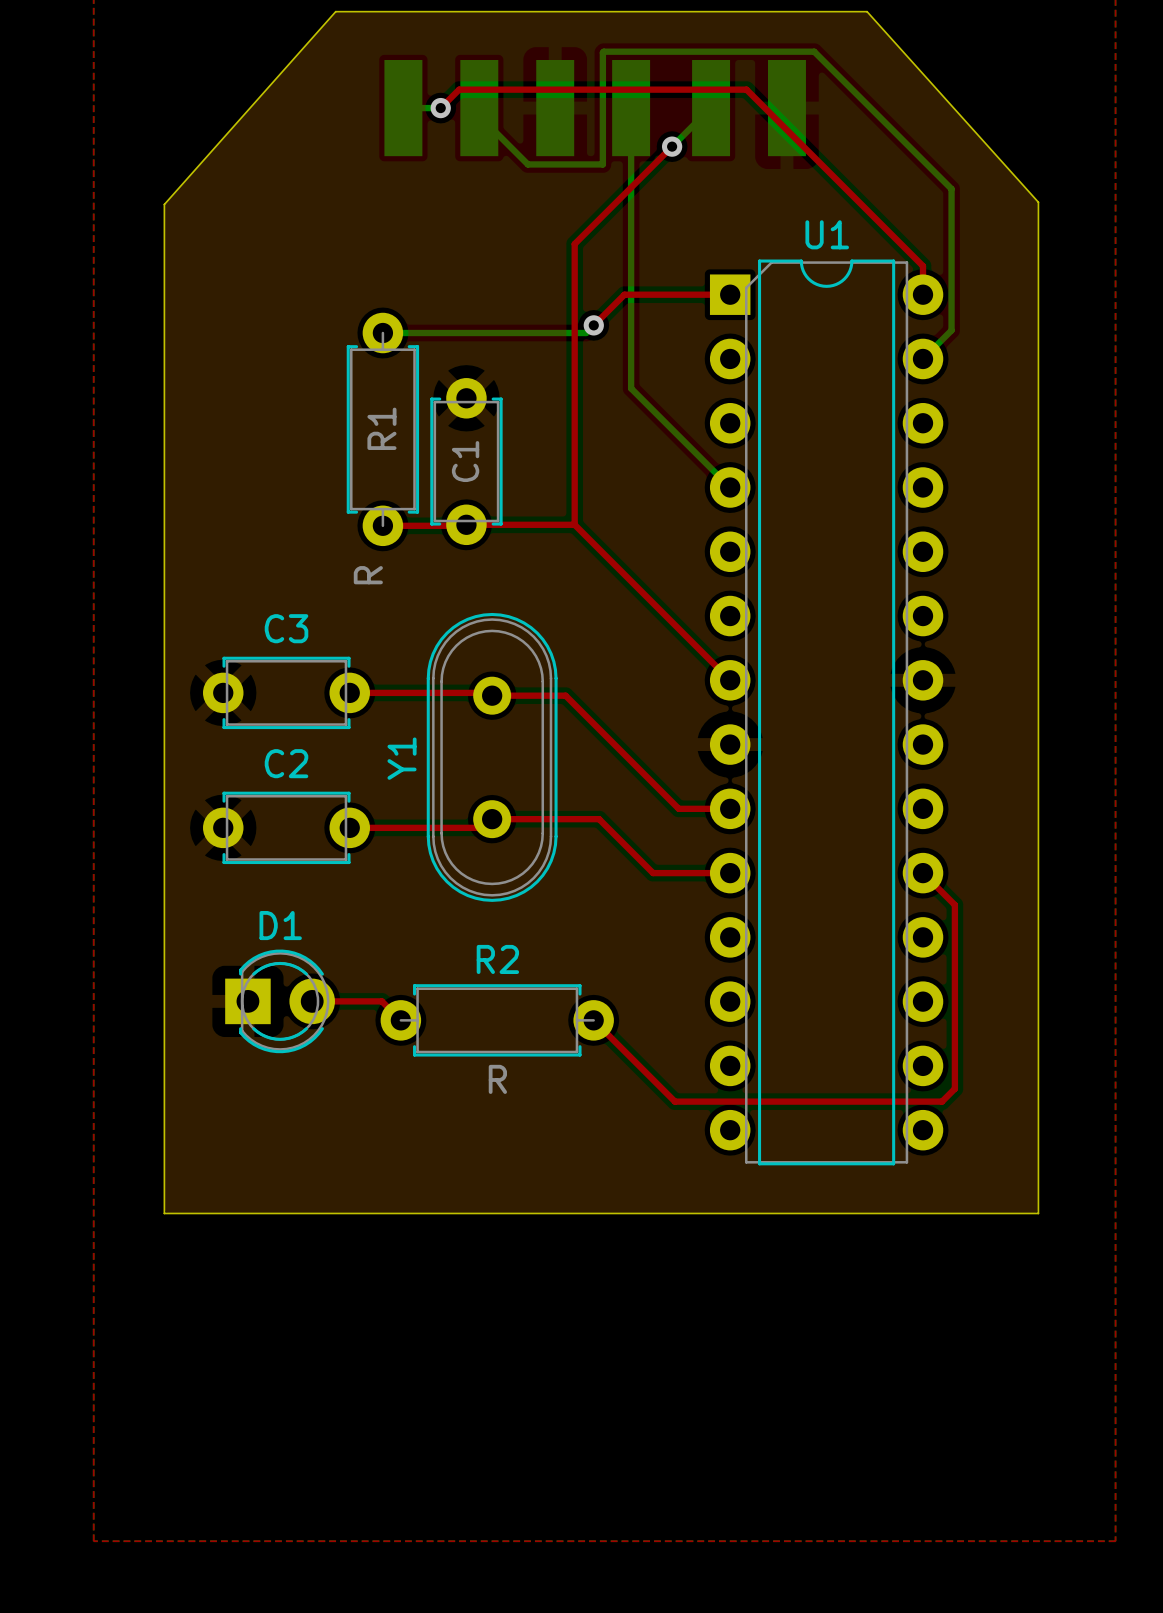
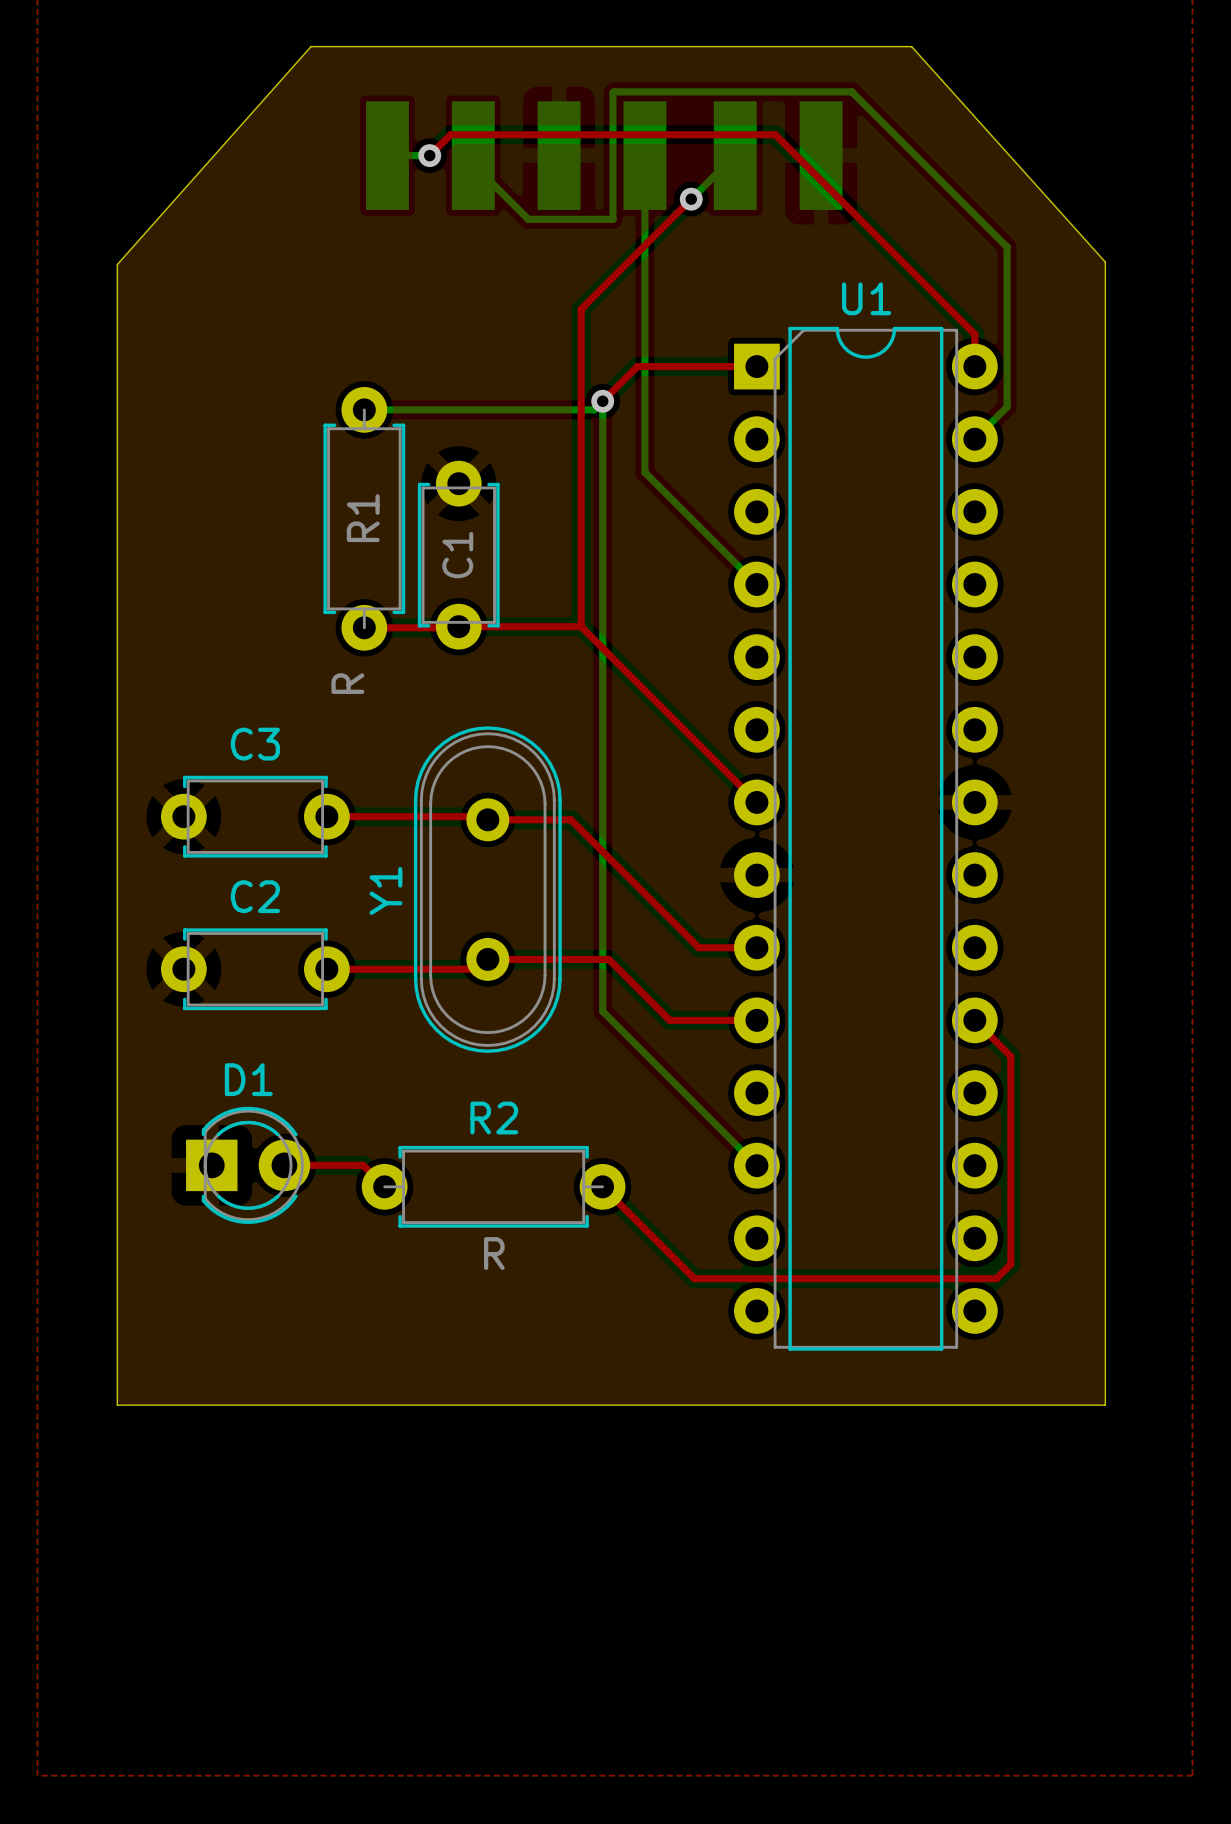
bottom track: none -> (602, 401) (602, 1011) (756, 1165)

